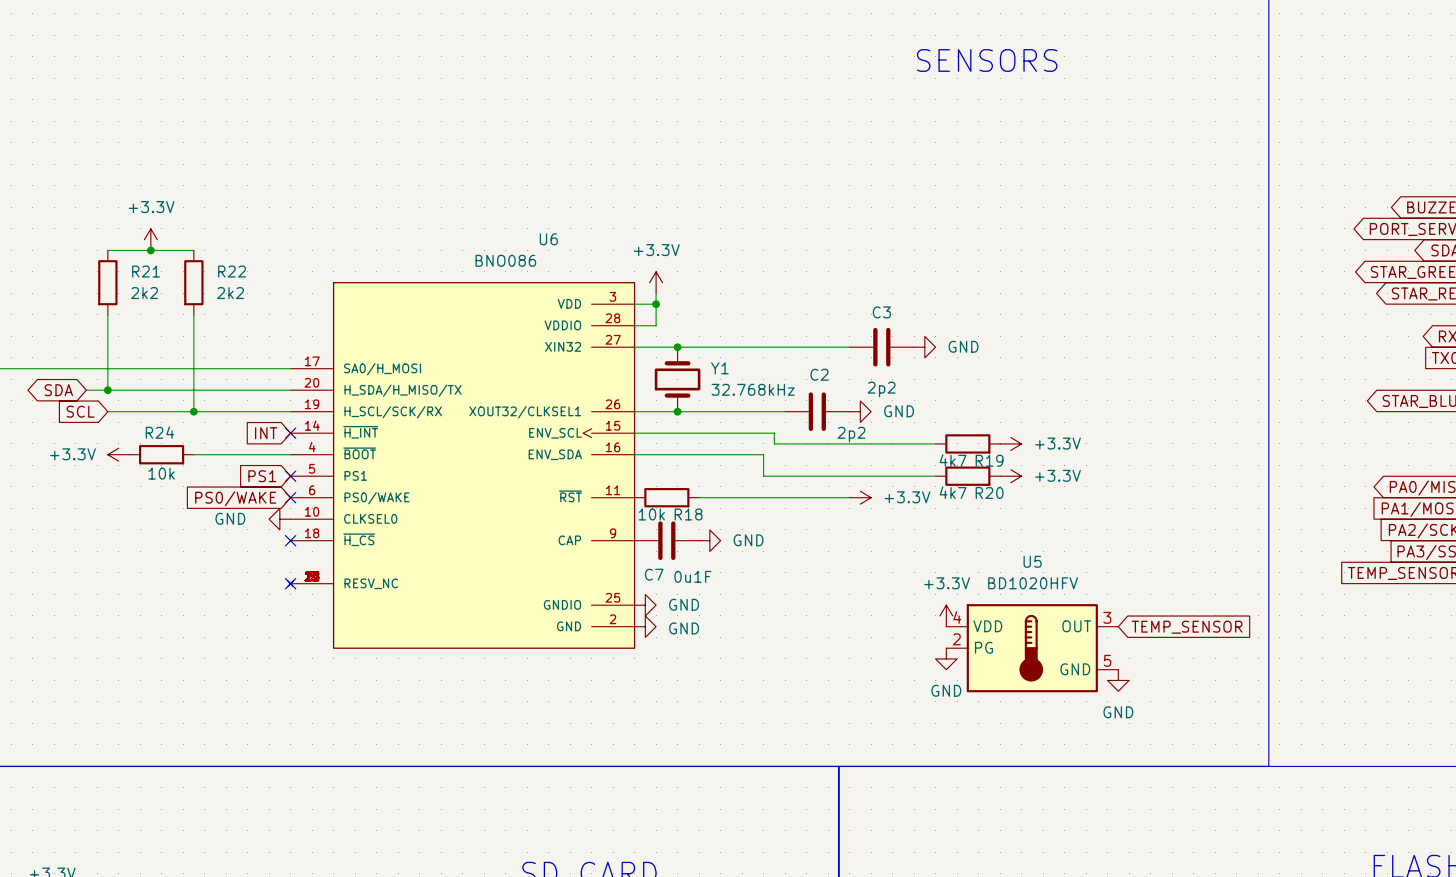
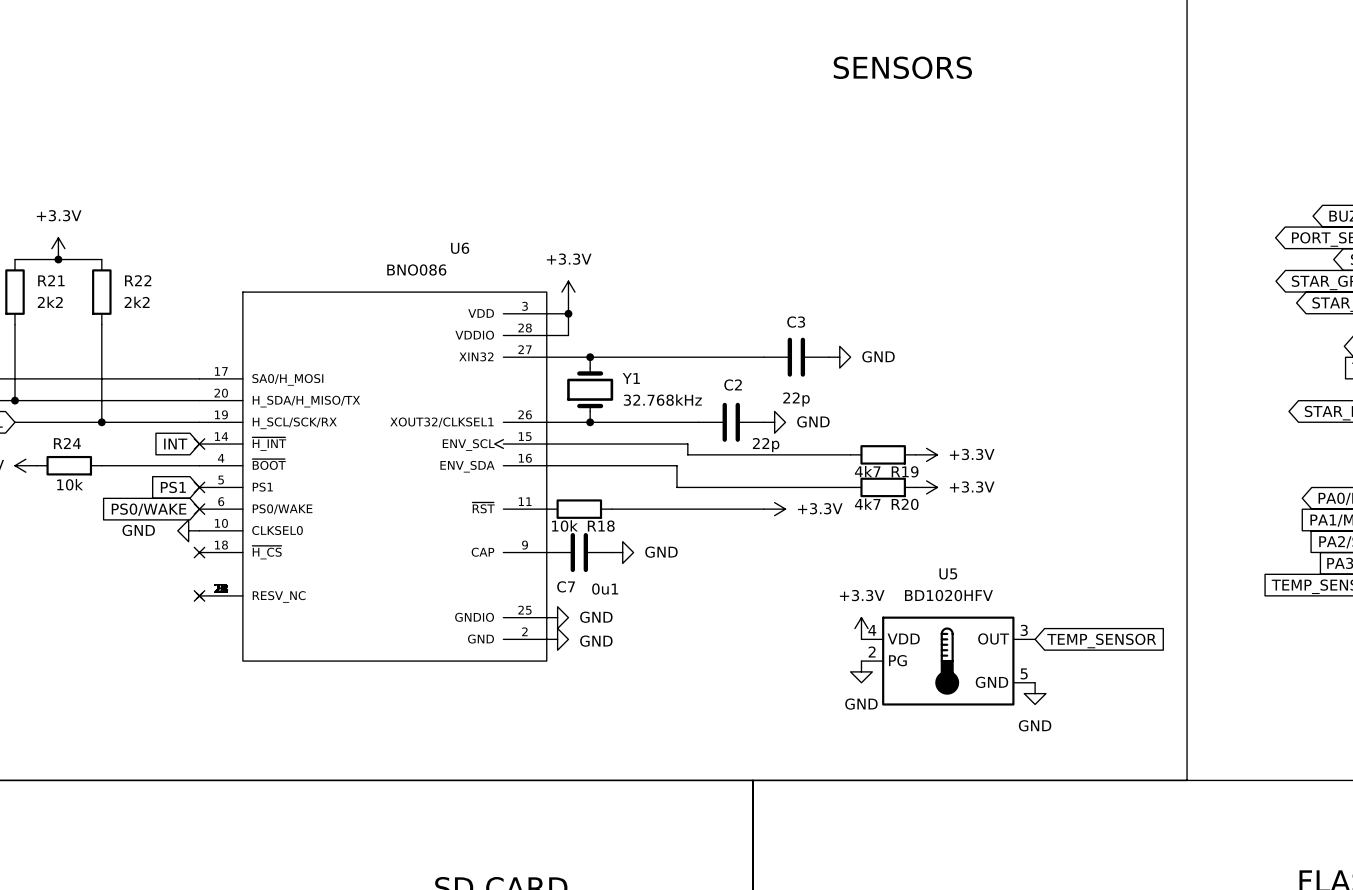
C3 value: 2p2 (881, 389) -> 22p (796, 399)
C2 value: 2p2 (851, 434) -> 22p (766, 445)
C7 value: 0u1F (692, 576) -> 0u1 (605, 589)

